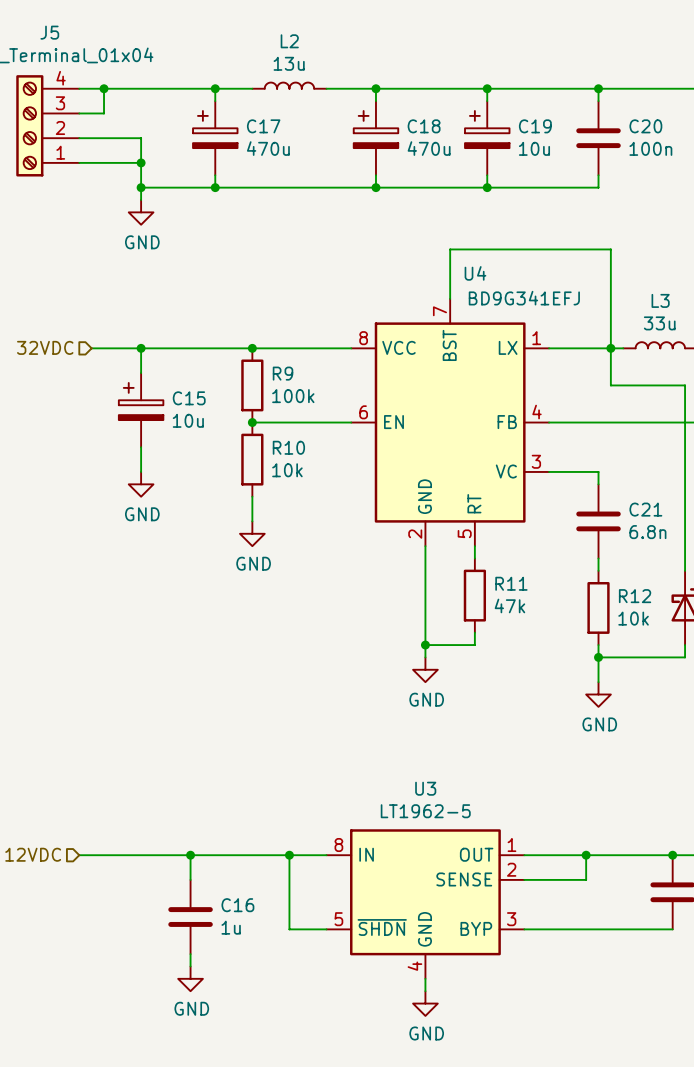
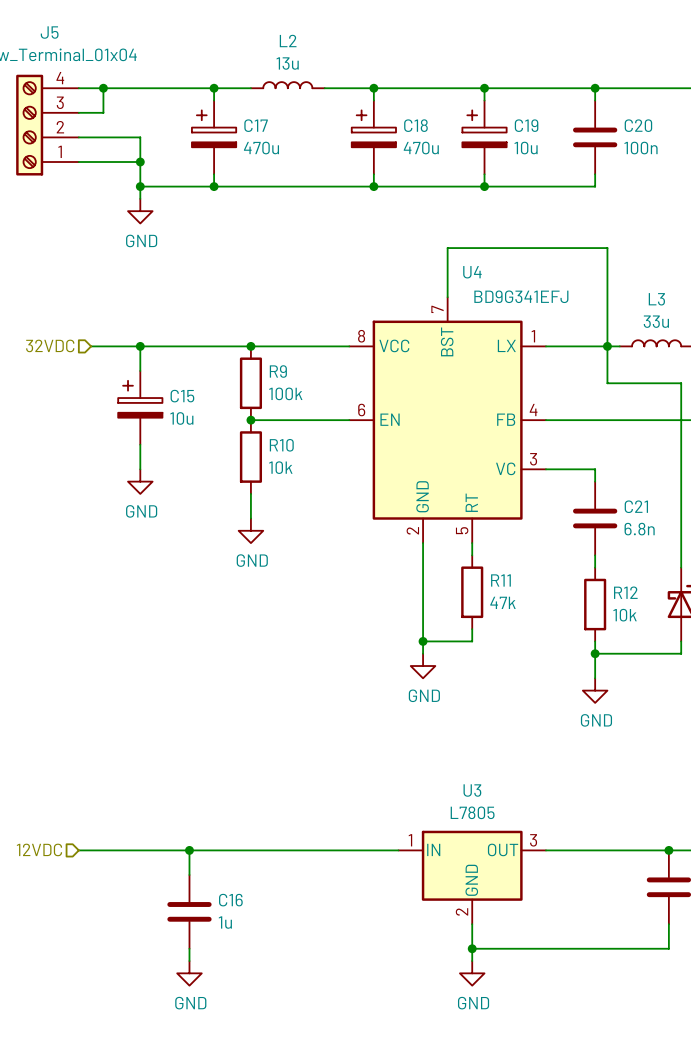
U3 name position: U3 (425, 788) -> U3 (472, 790)
U3 value: LT1962-5 (425, 811) -> L7805 (472, 812)
U3 symbol: [326, 829, 525, 979] -> [398, 830, 546, 925]
wire: (289, 855) (289, 929) (326, 929) -> none
junction: (289, 855) -> none
wire: (586, 855) (586, 879) (524, 879) -> none
junction: (586, 855) -> none
wire: (524, 929) (672, 929) -> (472, 948) (668, 948) (668, 924)
junction: none -> (472, 948)
wire: (425, 978) (425, 991) -> none
power symbol position: GND (425, 1003) -> GND (472, 973)

